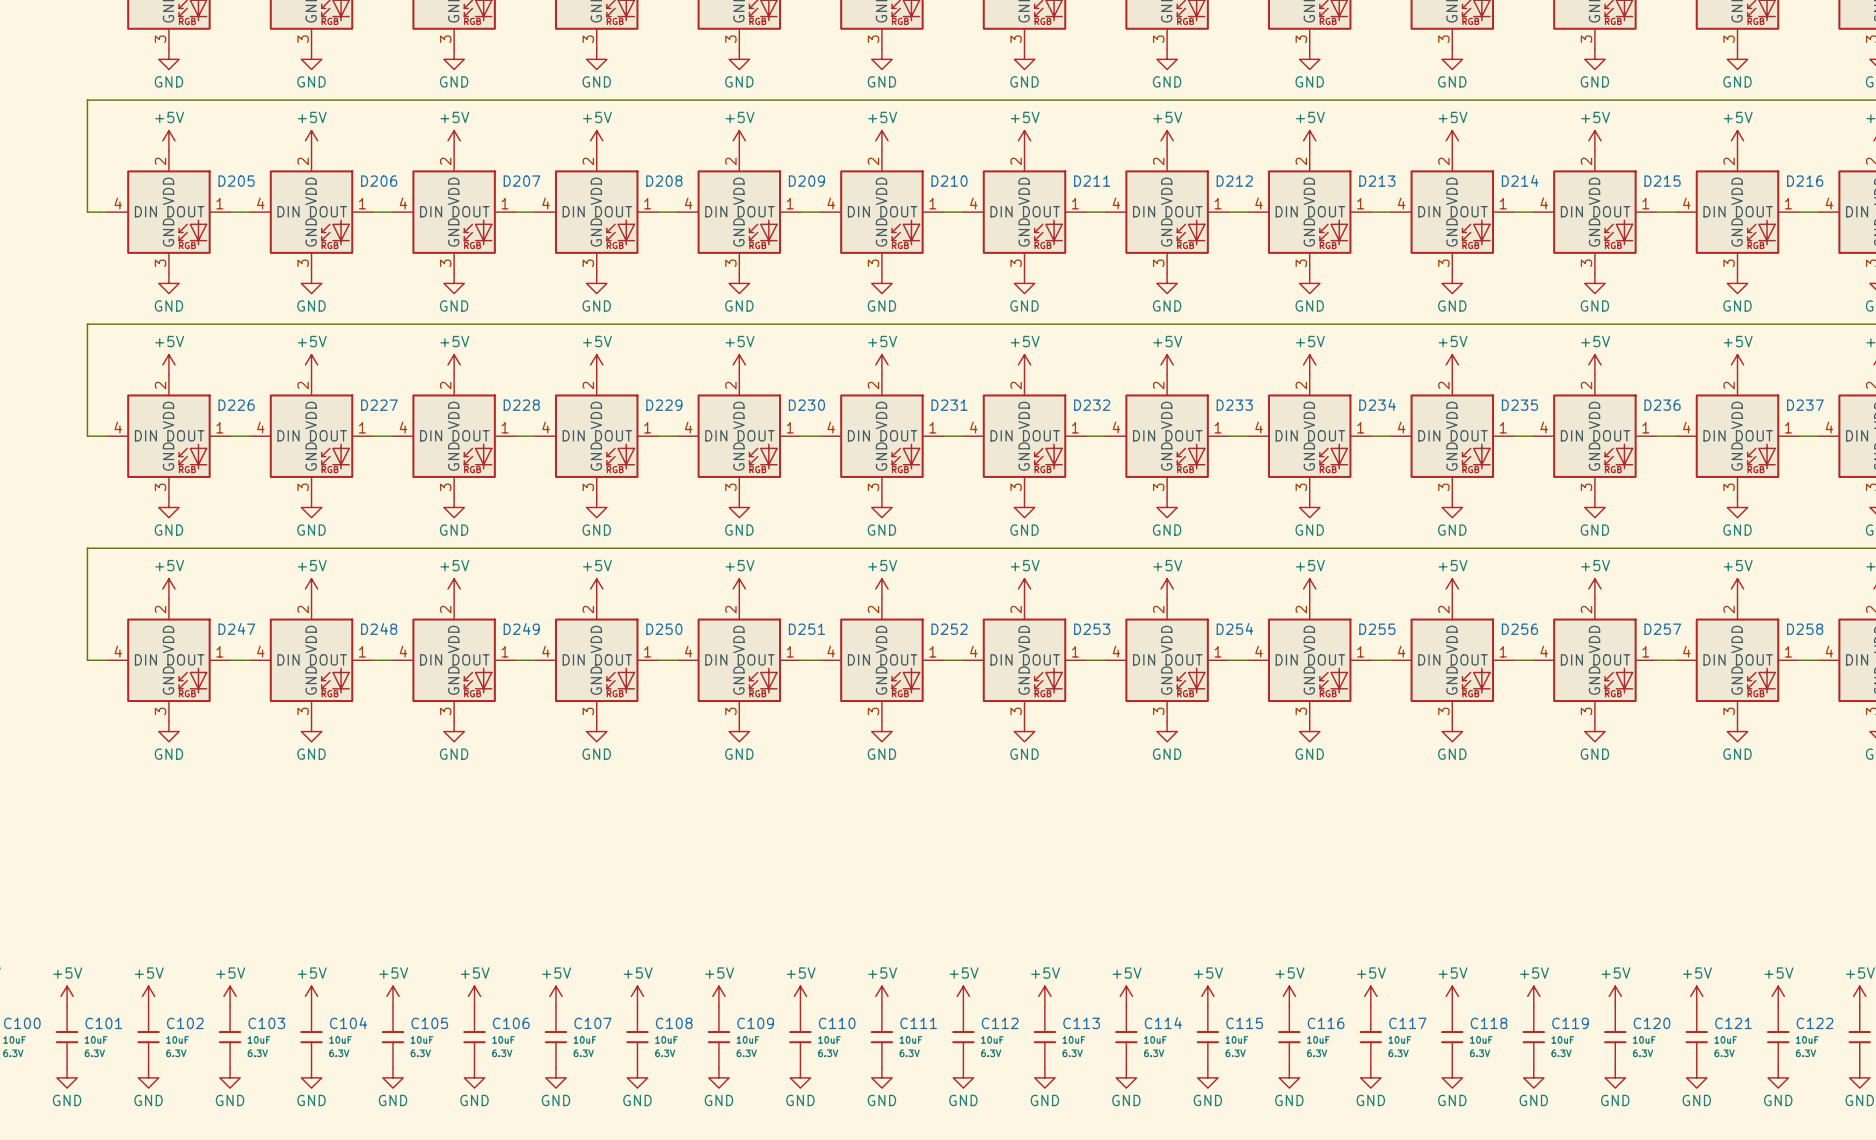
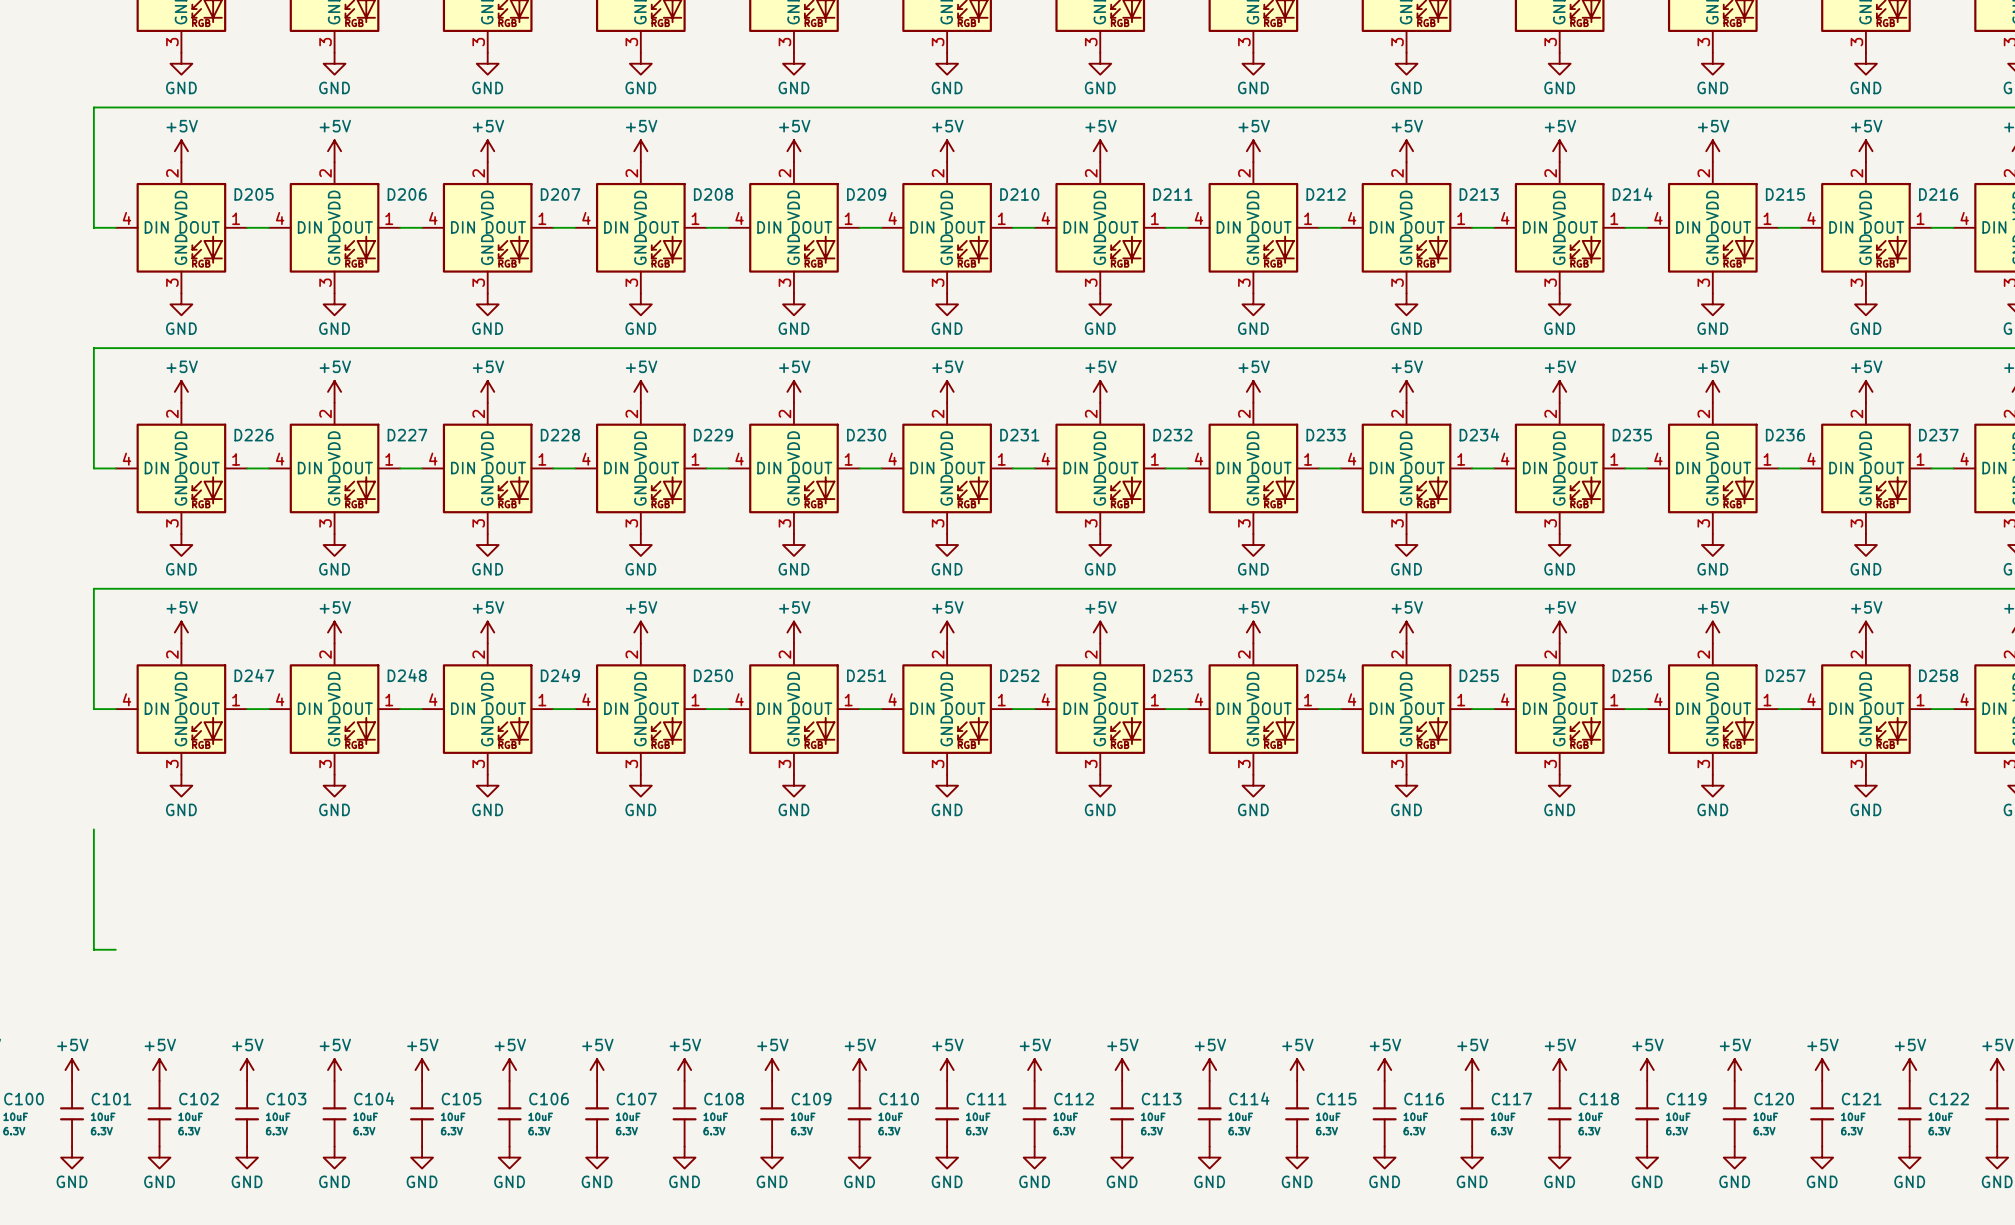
wire: none -> (93, 829) (93, 949) (115, 949)

